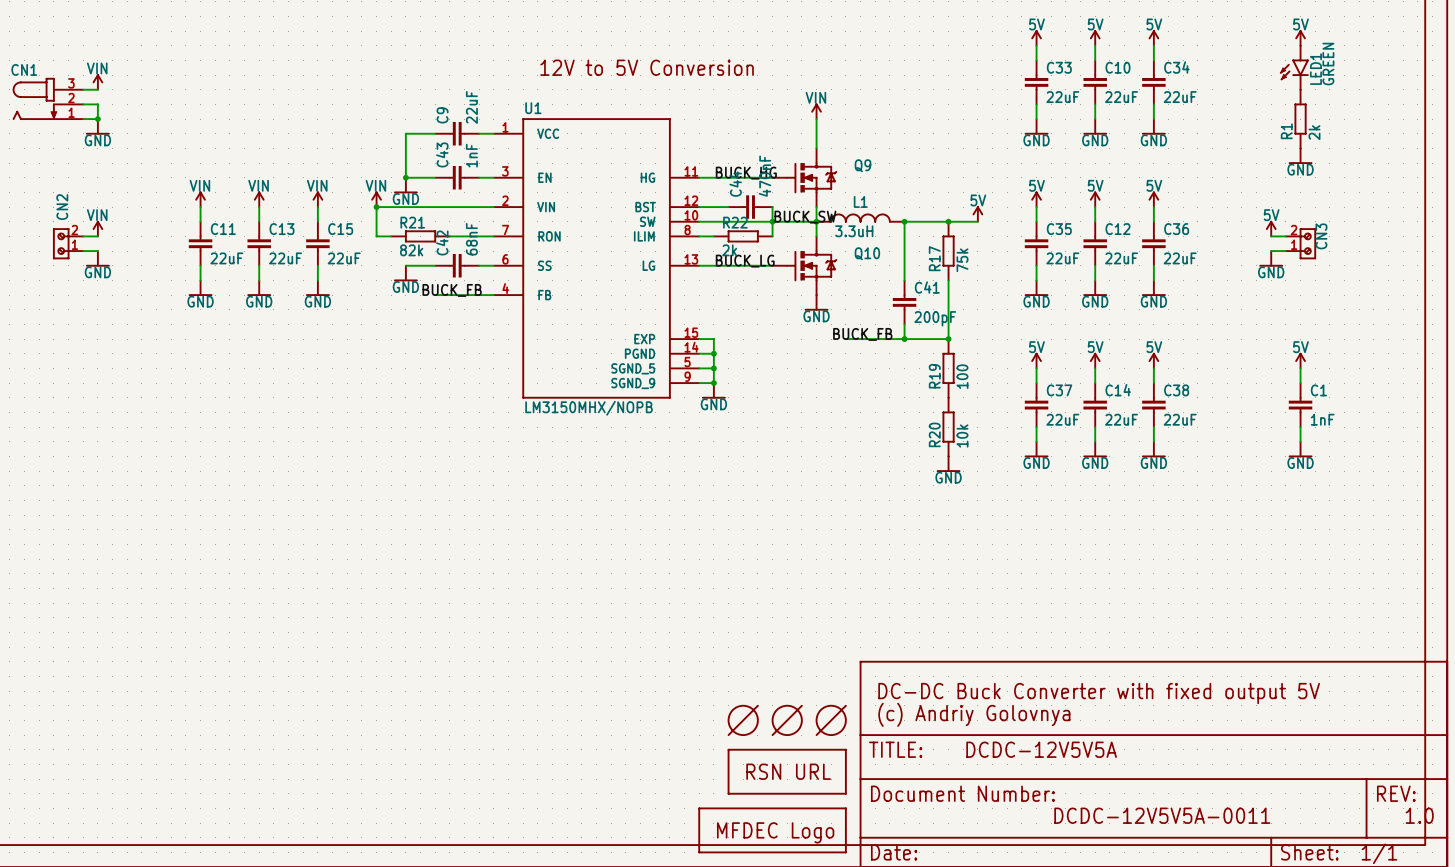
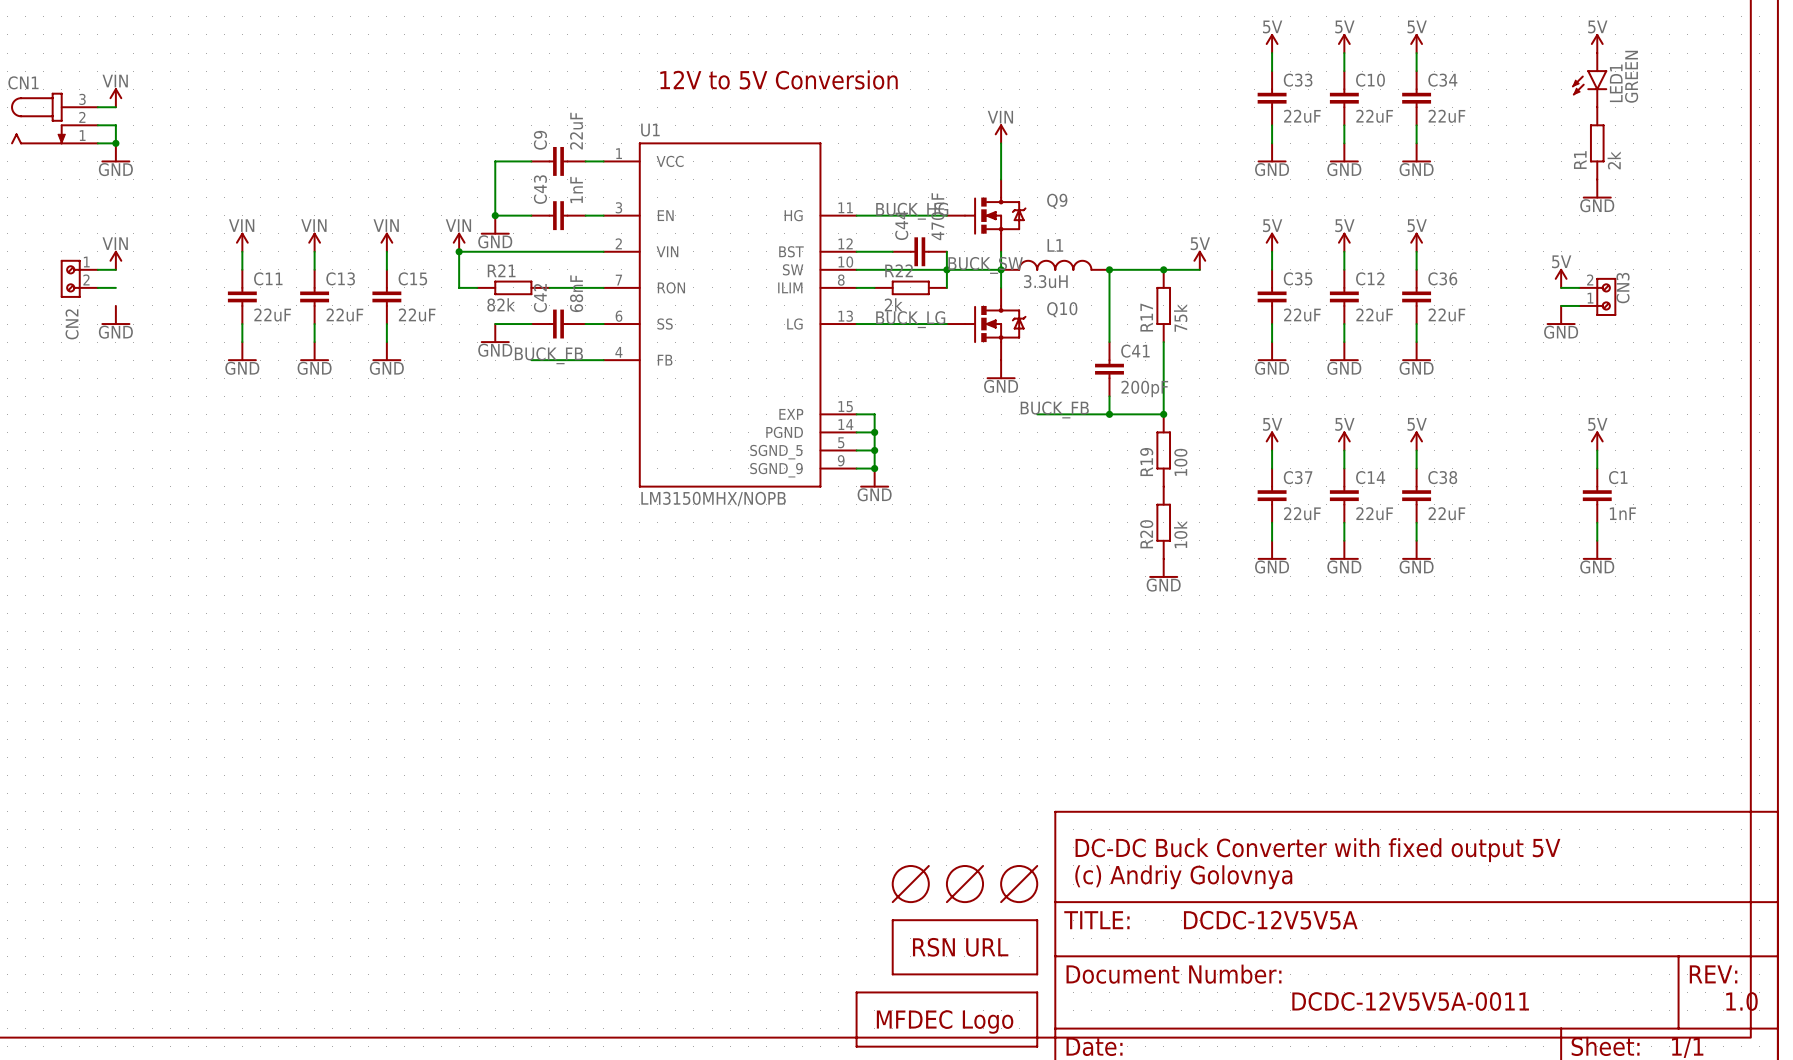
power symbol position: VIN (97, 228) -> VIN (115, 260)
CN2 flip: as is (61, 243) -> up-down (70, 278)
wire: (83, 251) (97, 251) -> (97, 269) (115, 269)

